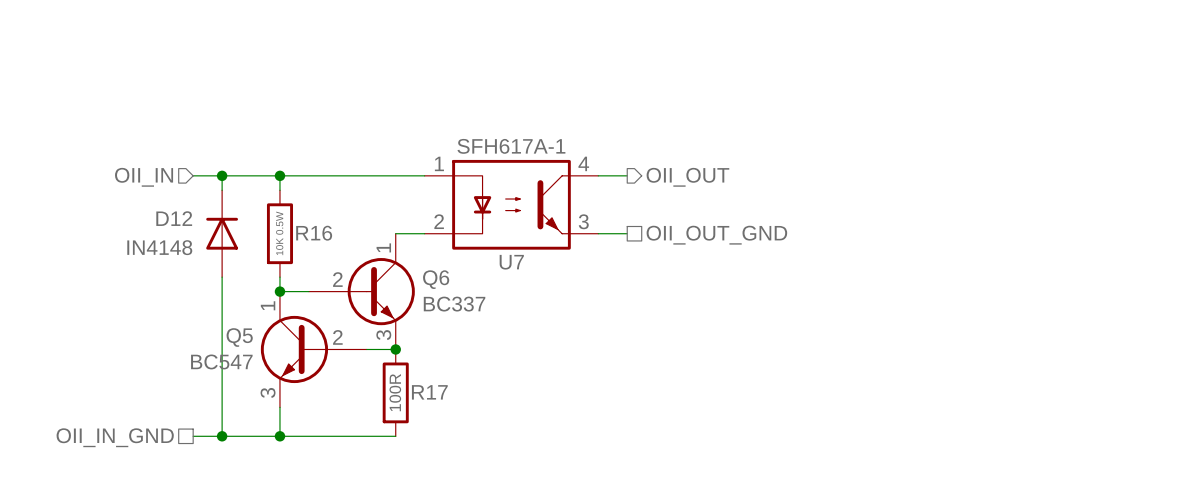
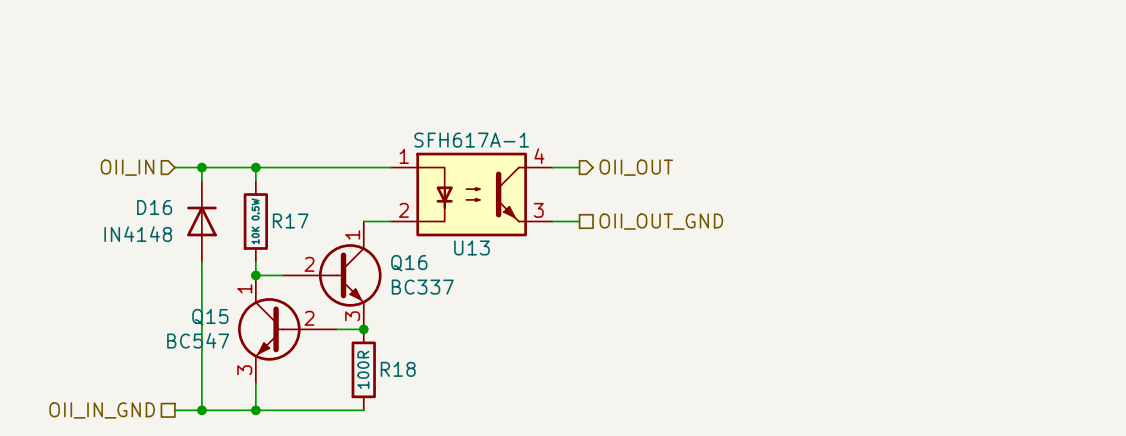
D12 name: D12 (174, 218) -> D16 (154, 207)
R16 name: R16 (314, 233) -> R17 (290, 220)
U7 name: U7 (511, 262) -> U13 (471, 247)
Q6 name: Q6 (436, 279) -> Q16 (409, 263)
Q5 name: Q5 (239, 337) -> Q15 (210, 317)
R17 name: R17 (429, 392) -> R18 (398, 369)

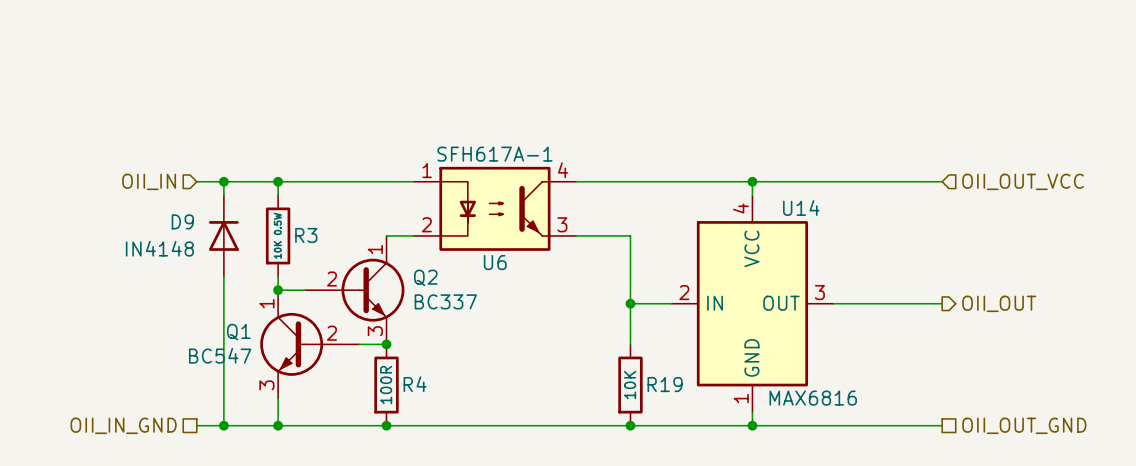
wire: none -> (603, 181) (942, 181)
hierarchical label: OII_OUT (636, 167) -> none
wire: none -> (752, 181) (752, 195)
junction: none -> (752, 181)
hierarchical label: none -> OII_OUT_VCC (1023, 181)
D16 name: D16 (154, 207) -> D9 (182, 221)
R17 name: R17 (290, 220) -> R3 (306, 235)
wire: none -> (603, 235) (630, 235) (630, 344)
hierarchical label: OII_OUT_GND (661, 221) -> none
U13 name: U13 (471, 247) -> U6 (495, 262)
Q16 name: Q16 (409, 263) -> Q2 (425, 277)
wire: none -> (630, 303) (671, 303)
junction: none -> (630, 303)
U14: none -> MAX6816 (752, 303)
wire: none -> (833, 303) (942, 303)
hierarchical label: none -> OII_OUT (999, 303)
Q15 name: Q15 (210, 317) -> Q1 (238, 332)
R18 name: R18 (398, 369) -> R4 (415, 384)
R19: none -> 10K (630, 385)
wire: none -> (752, 412) (752, 425)
wire: none -> (386, 425) (942, 425)
junction: none -> (386, 425)
junction: none -> (630, 425)
junction: none -> (752, 425)
hierarchical label: none -> OII_OUT_GND (1024, 425)

